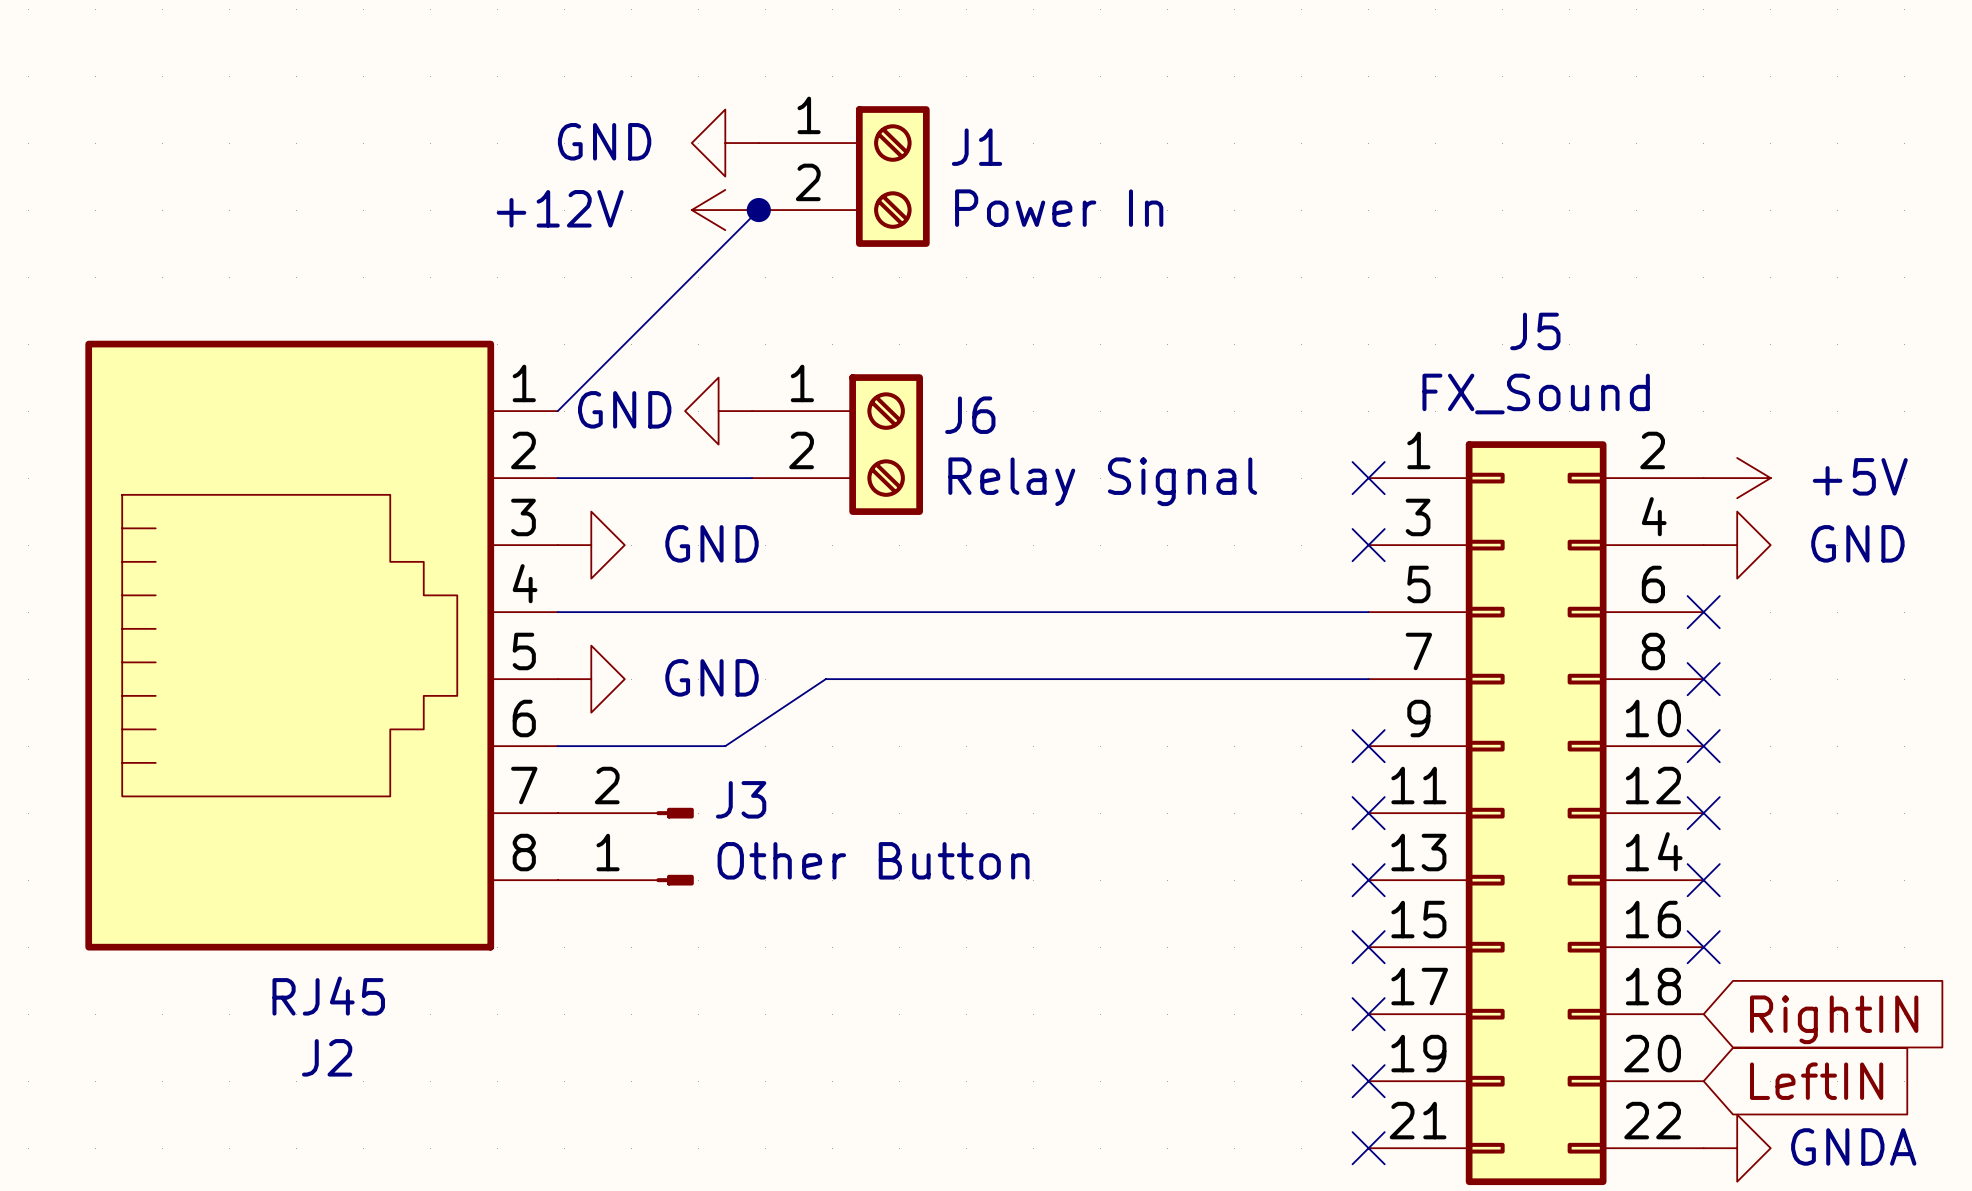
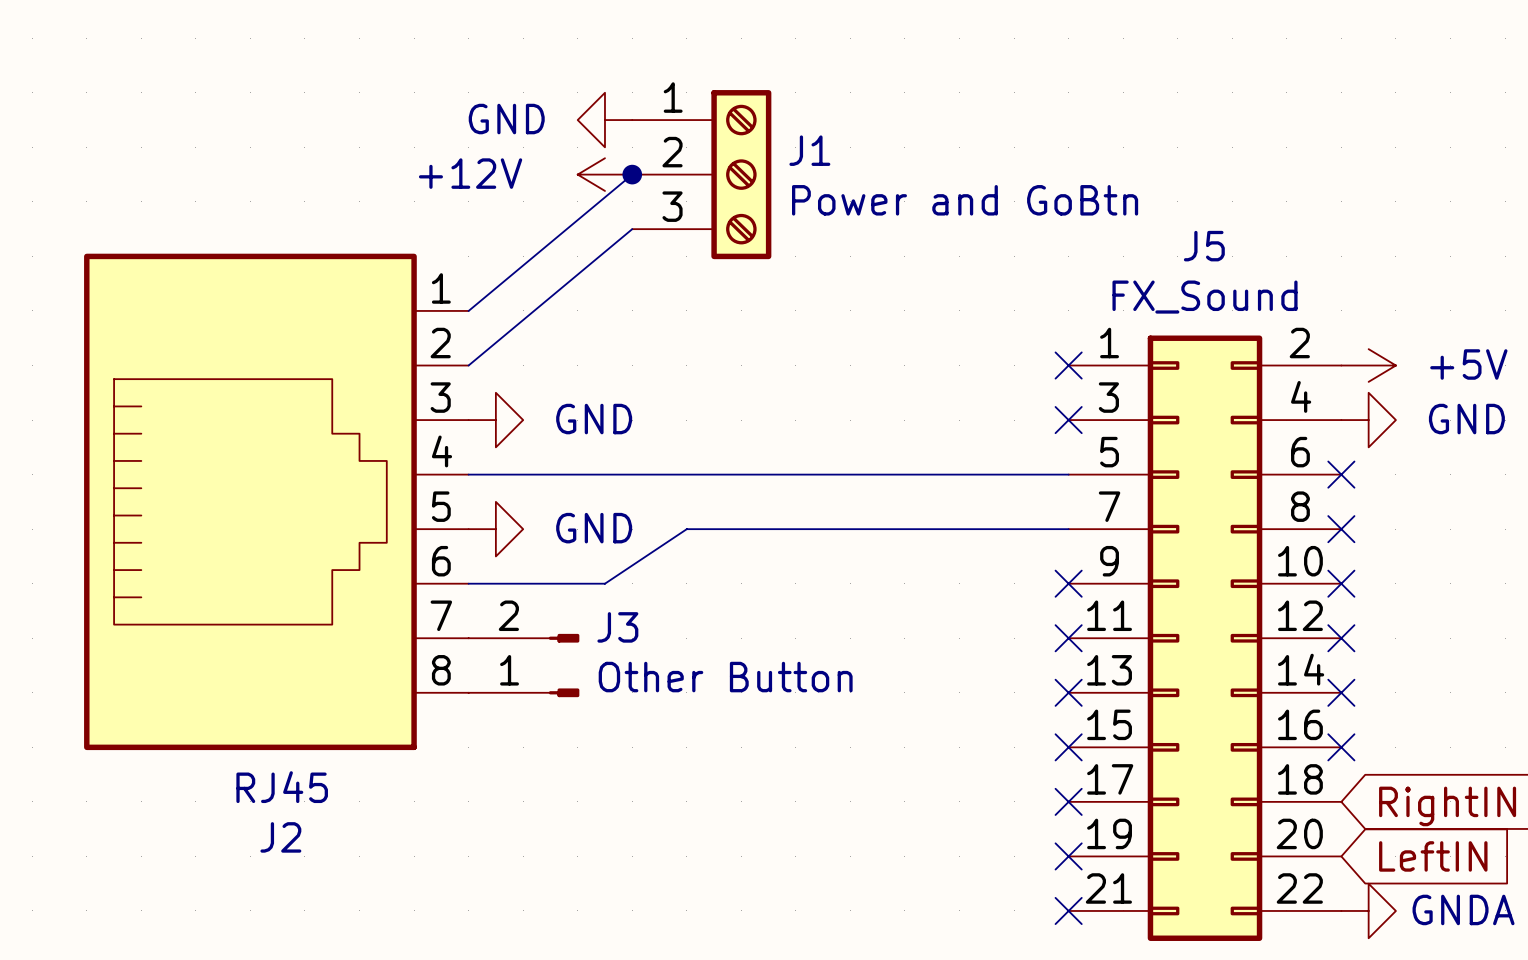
J1 symbol: [758, 106, 930, 247] -> [632, 90, 772, 260]
power symbol position: GND (725, 143) -> GND (604, 120)
J1 value: Power In (1059, 208) -> Power and GoBtn (965, 200)
power symbol position: +12V (725, 210) -> +12V (604, 174)
wire: (758, 210) (557, 411) -> none
junction position: (758, 210) -> (632, 174)
wire: none -> (632, 174) (468, 310)
wire: none -> (632, 229) (468, 365)
power symbol: GND (718, 411) -> none
J6: Relay Signal (837, 444) -> none
wire: (557, 478) (752, 478) -> none
power symbol: GND (591, 545) -> none
power symbol: none -> GND (495, 420)
J2 position: (321, 645) -> (276, 501)
power symbol position: GND (591, 679) -> GND (495, 529)
wire: (899, 679) (825, 679) (725, 746) -> (686, 529) (604, 583) (544, 583)
J3 position: (625, 846) -> (523, 665)

